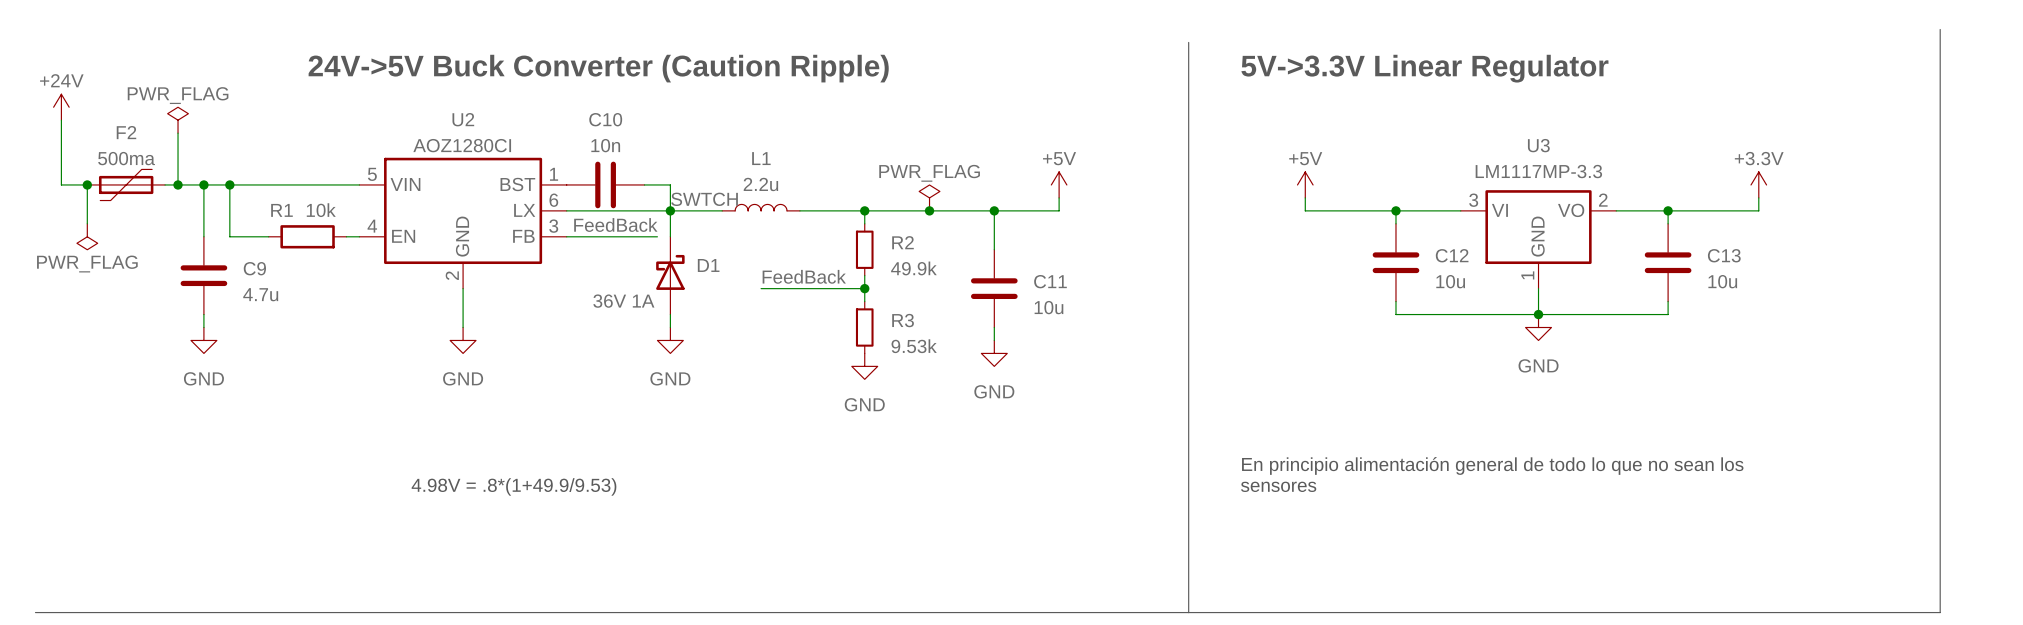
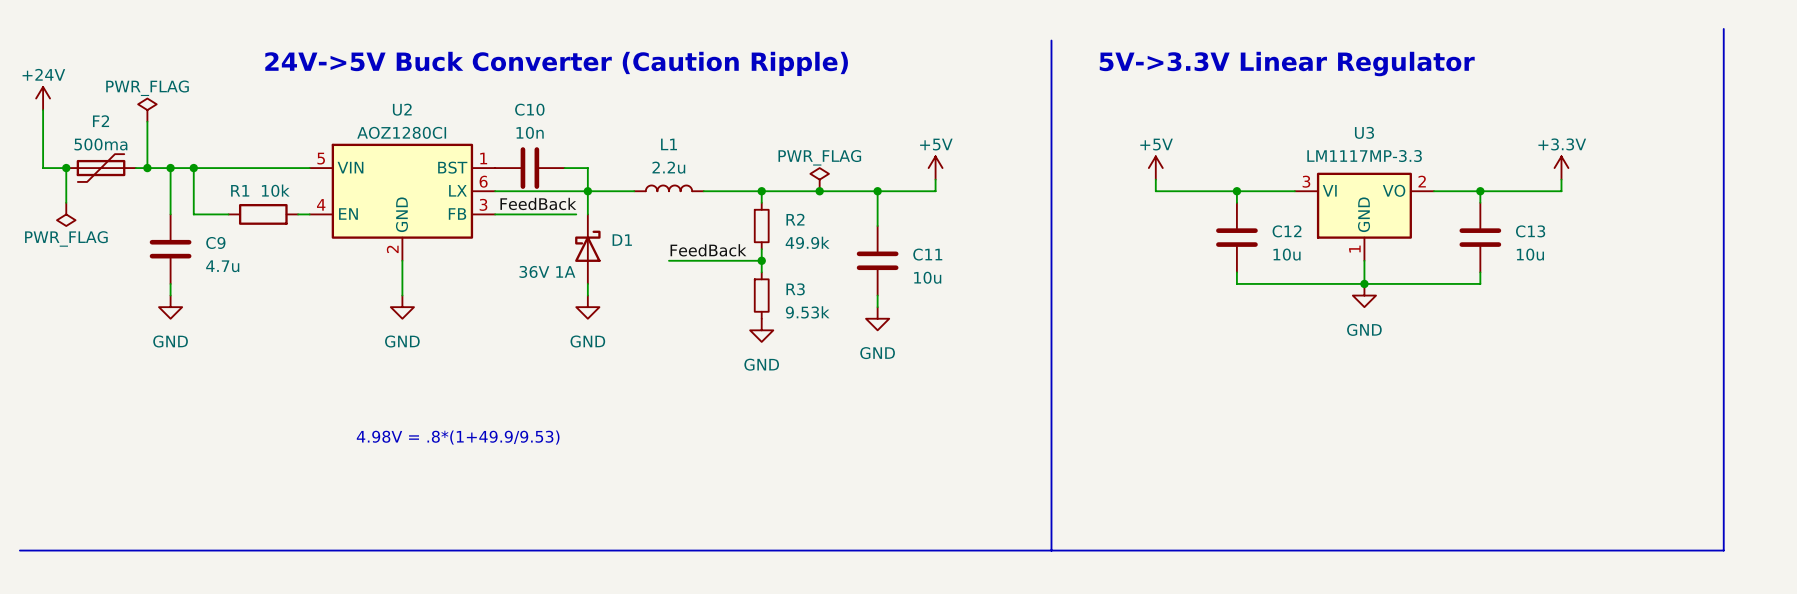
label: SWTCH (704, 199) -> none
text: En principio alimentación general de todo lo que no sean los (1492, 465) -> none
text: sensores (1278, 486) -> none

